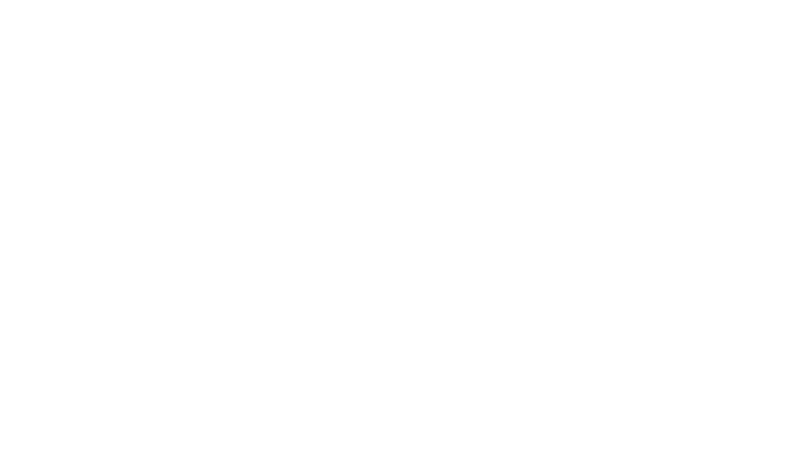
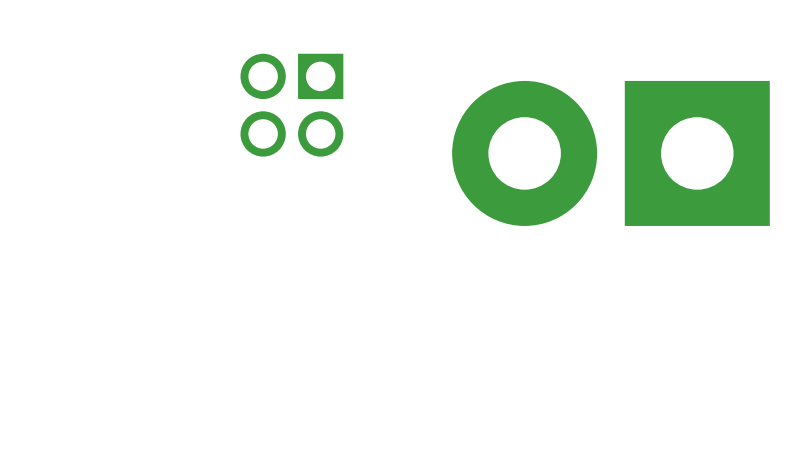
part: none -> (291, 105)
part: none -> (610, 153)

